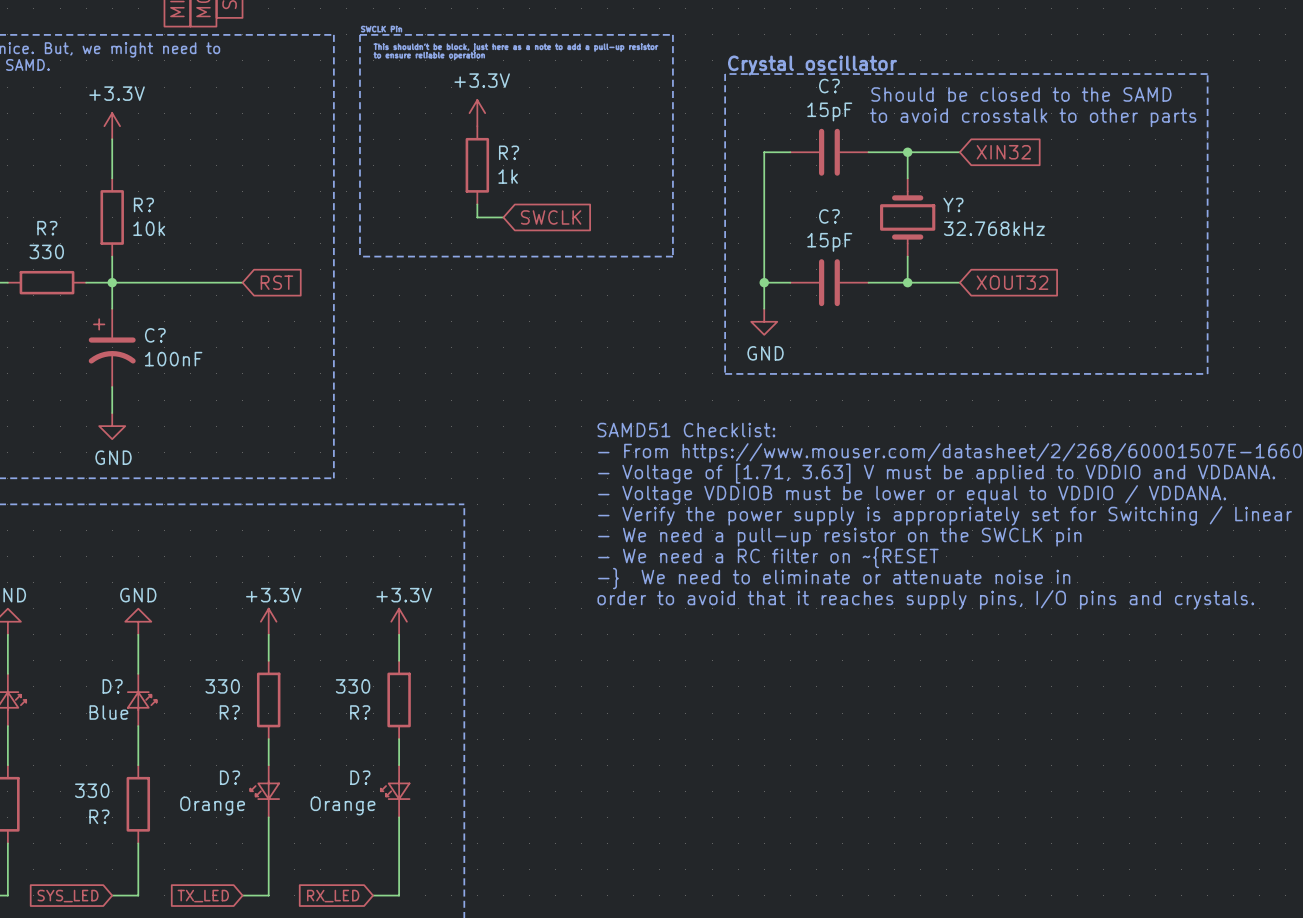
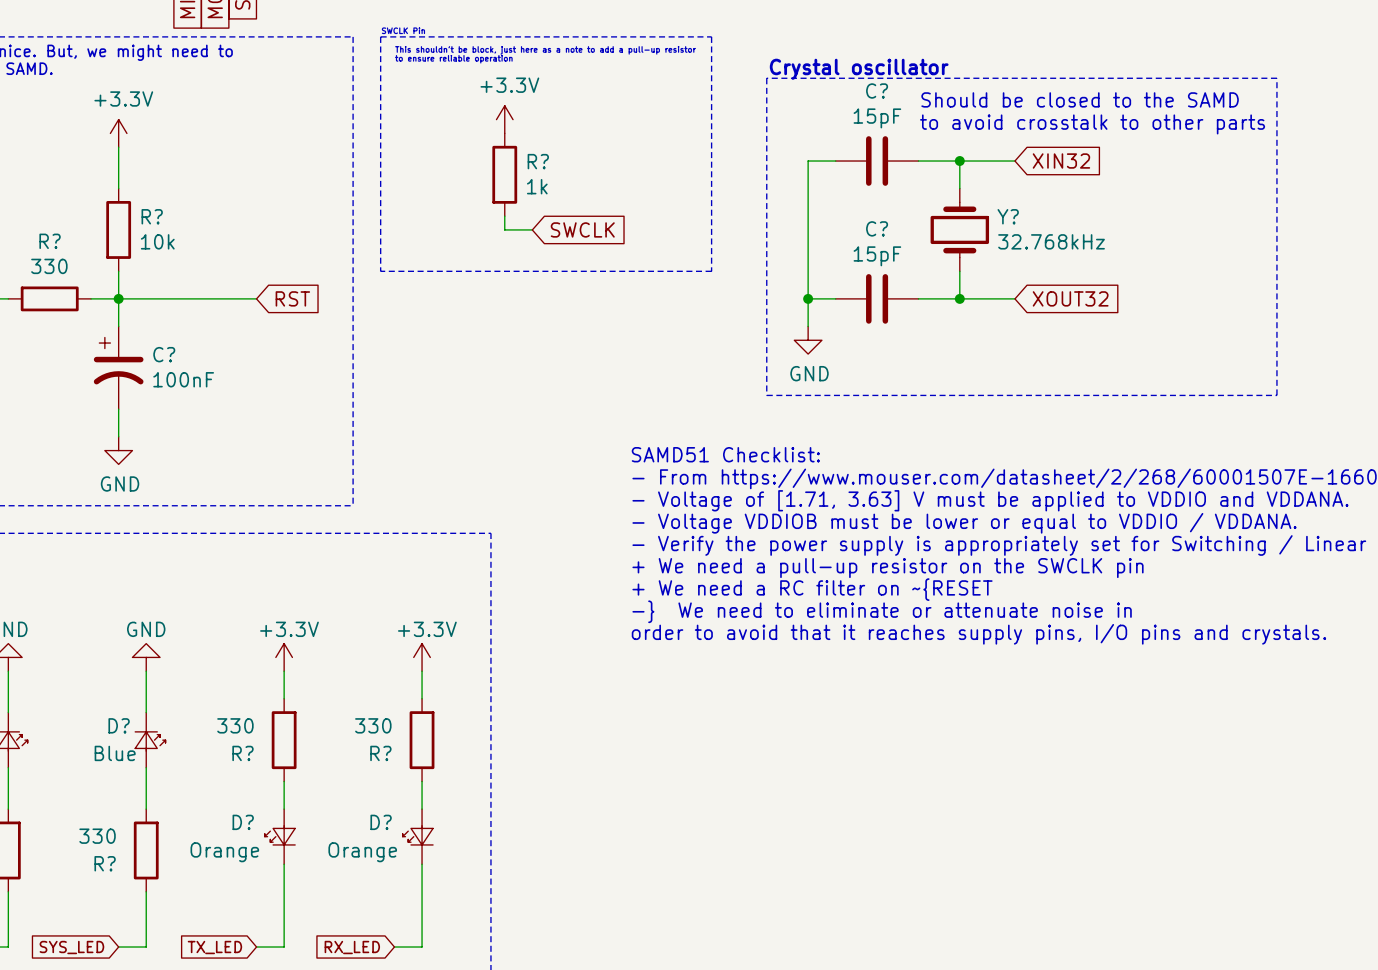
text: - We need a pull-up resistor on the SWCLK pin (839, 537) -> + We need a pull-up resistor on the SWCLK pin (888, 568)
text: - We need a RC filter on ~{RESET (768, 557) -> + We need a RC filter on ~{RESET (812, 589)

